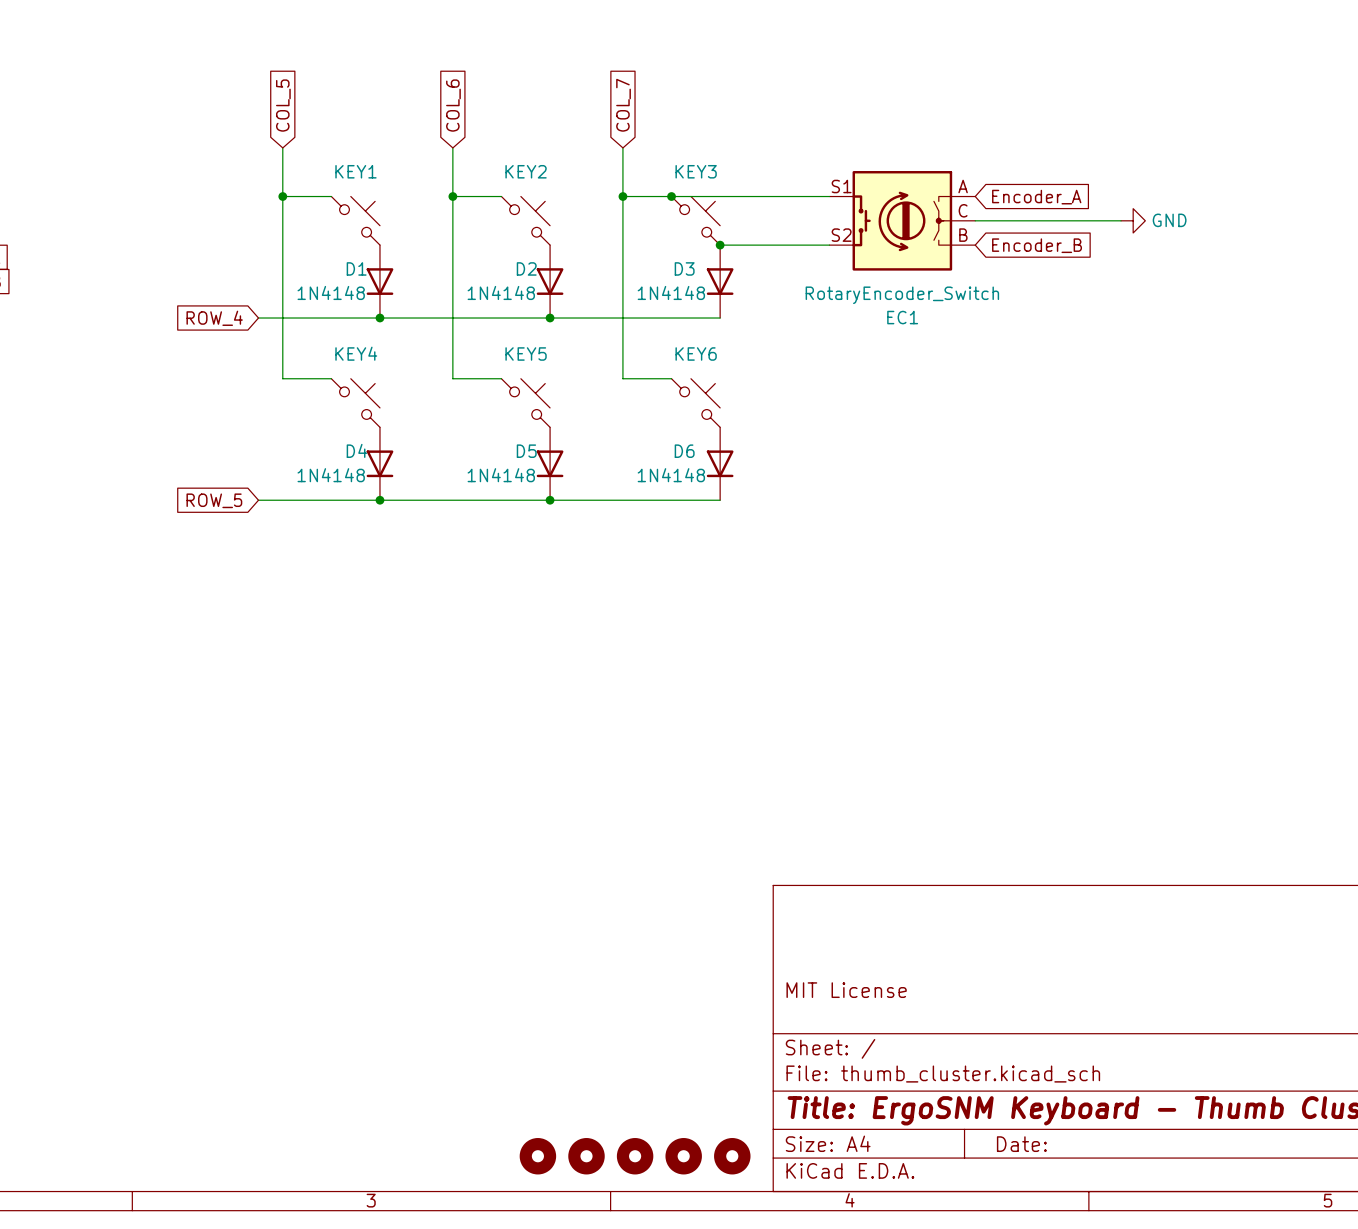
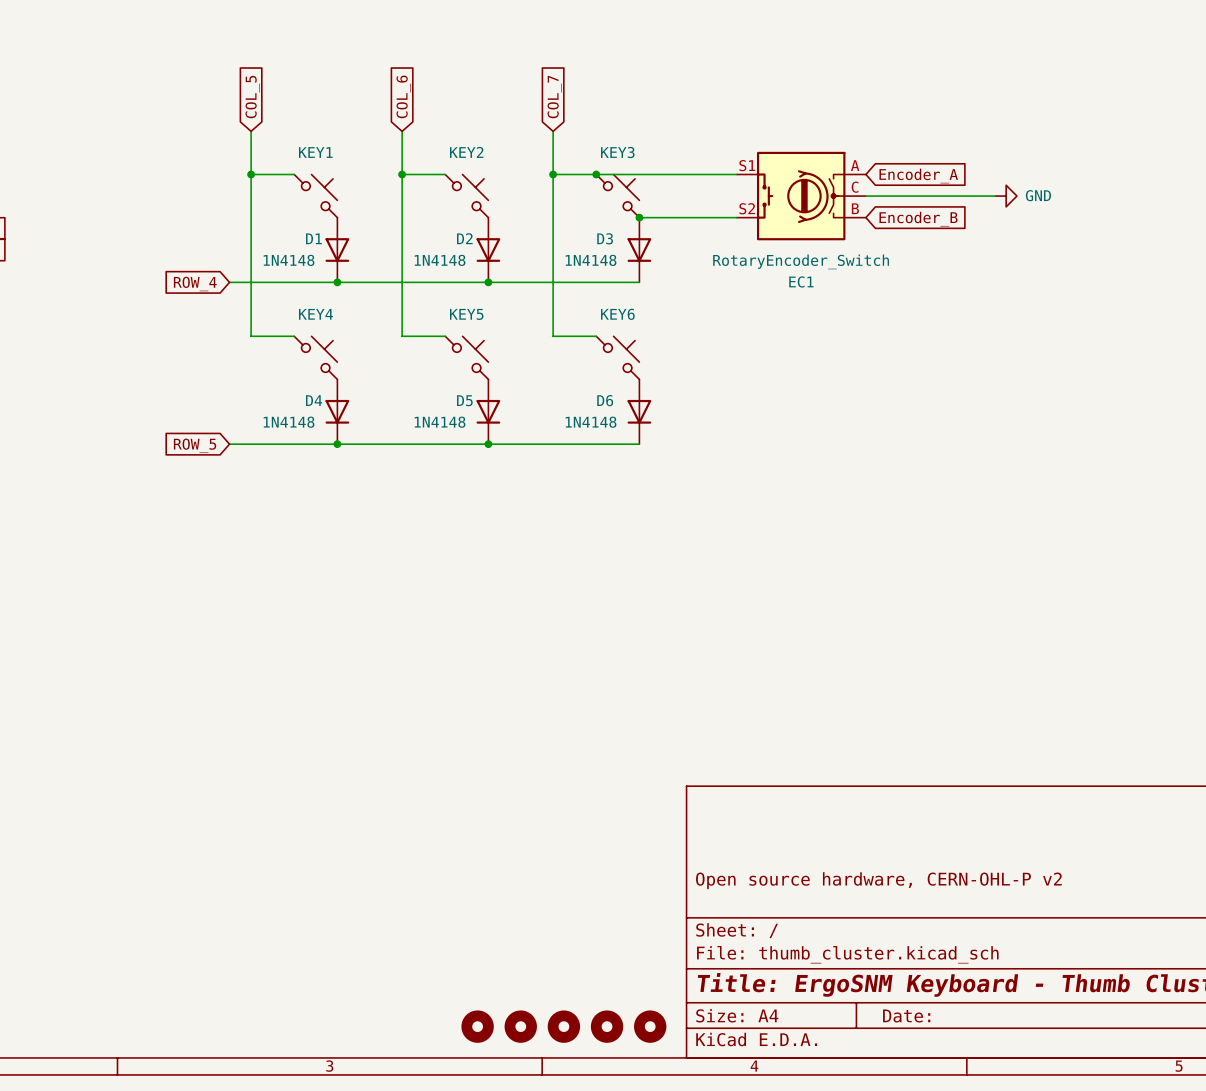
EC1 symbol: [829, 171, 976, 271] -> [736, 151, 866, 241]
title block: MIT License (846, 990) -> Open source hardware, CERN-OHL-P v2 (878, 880)

